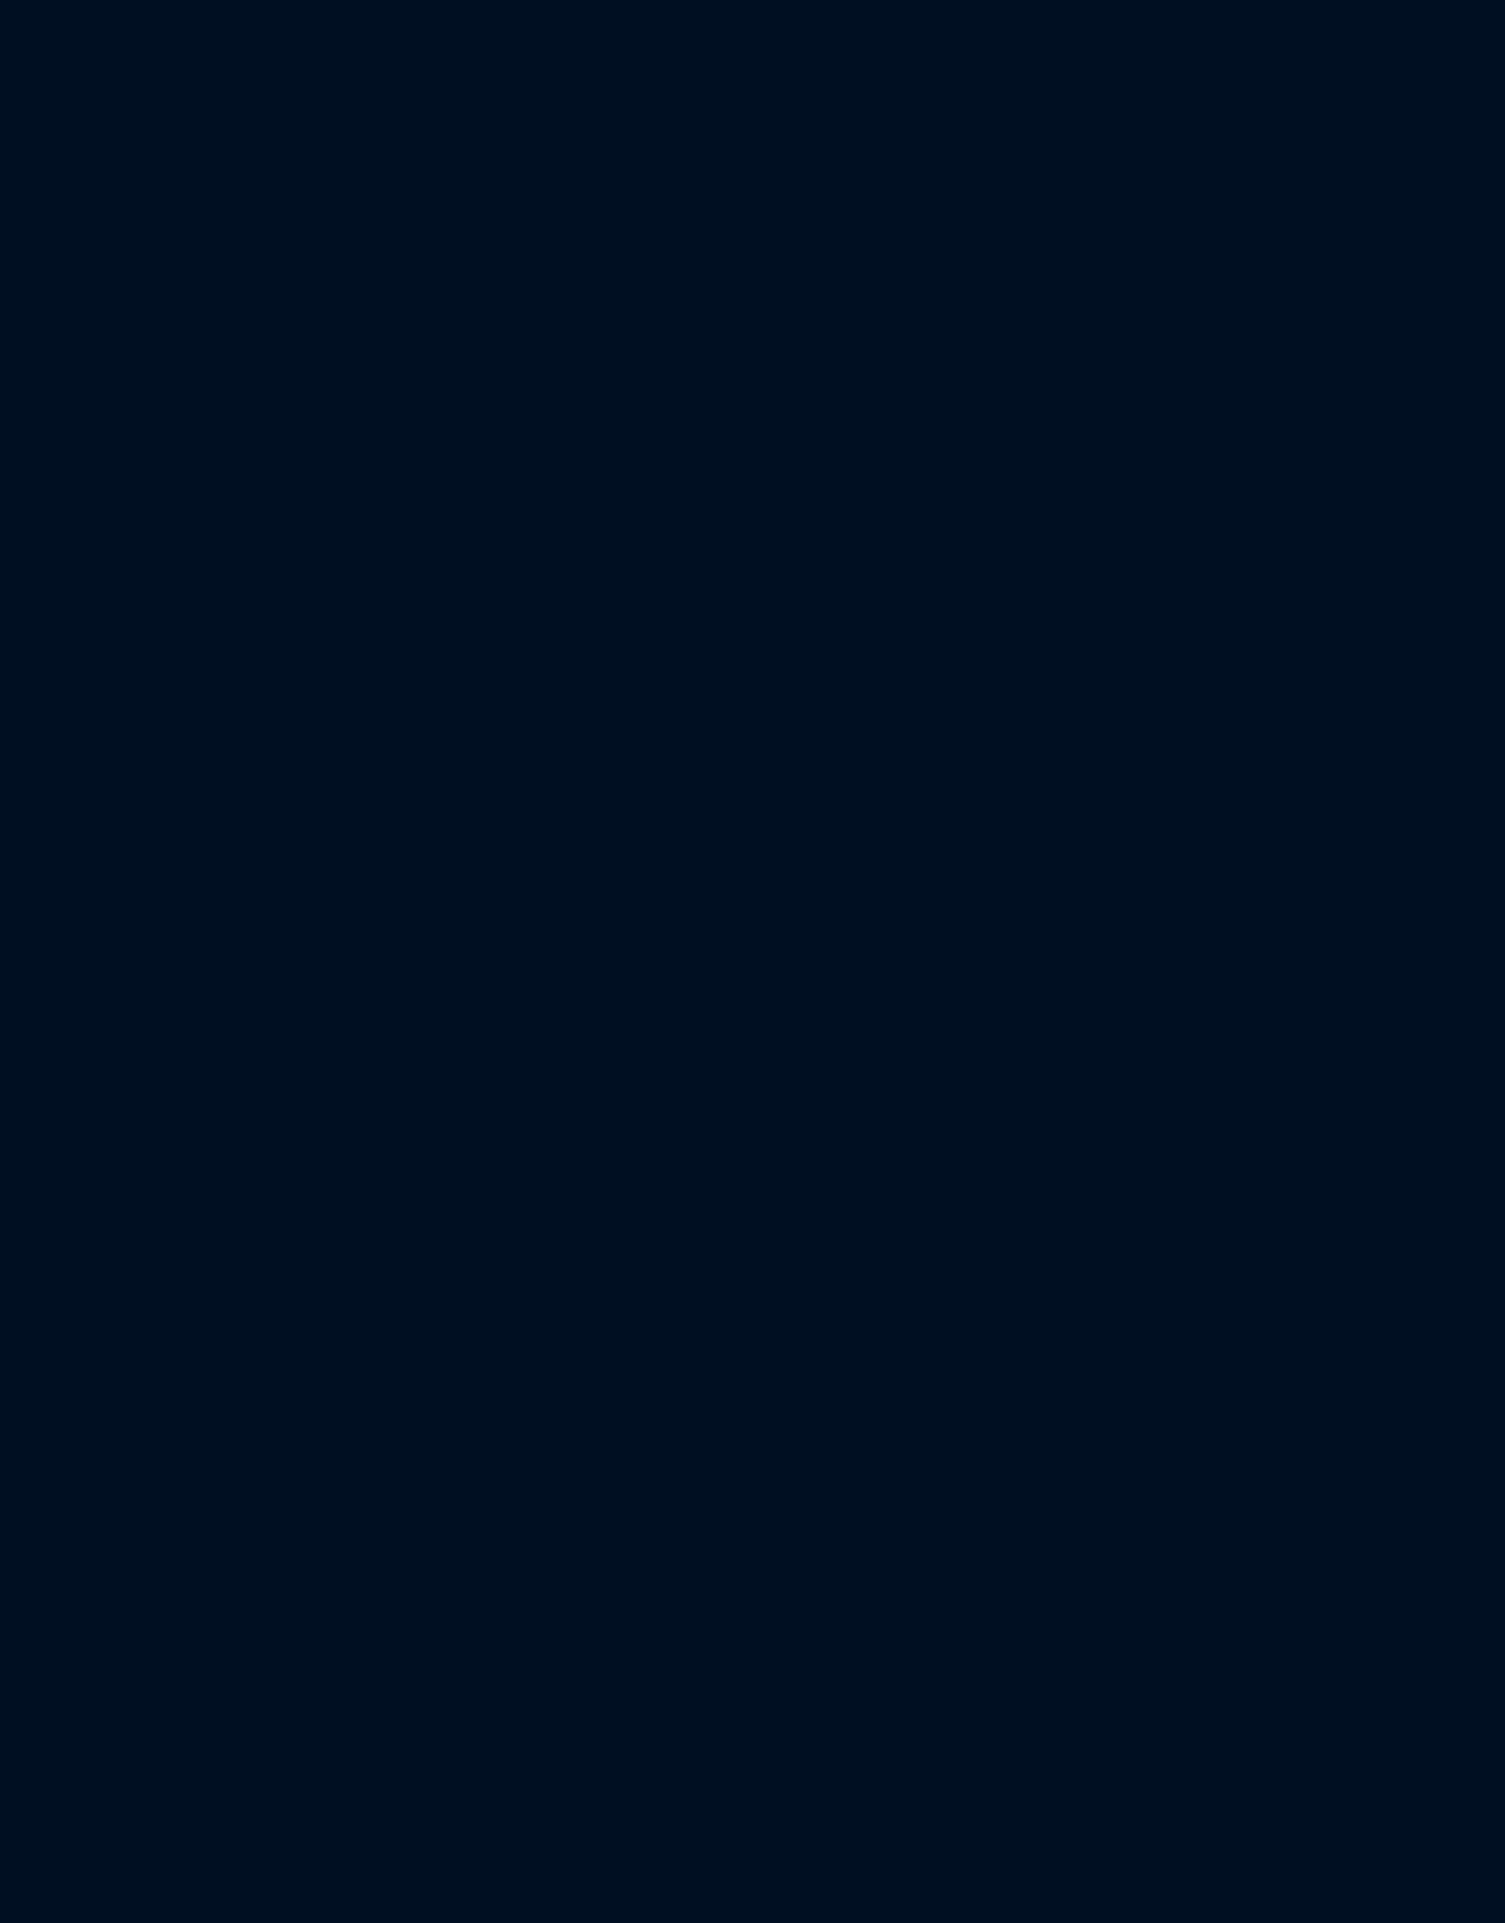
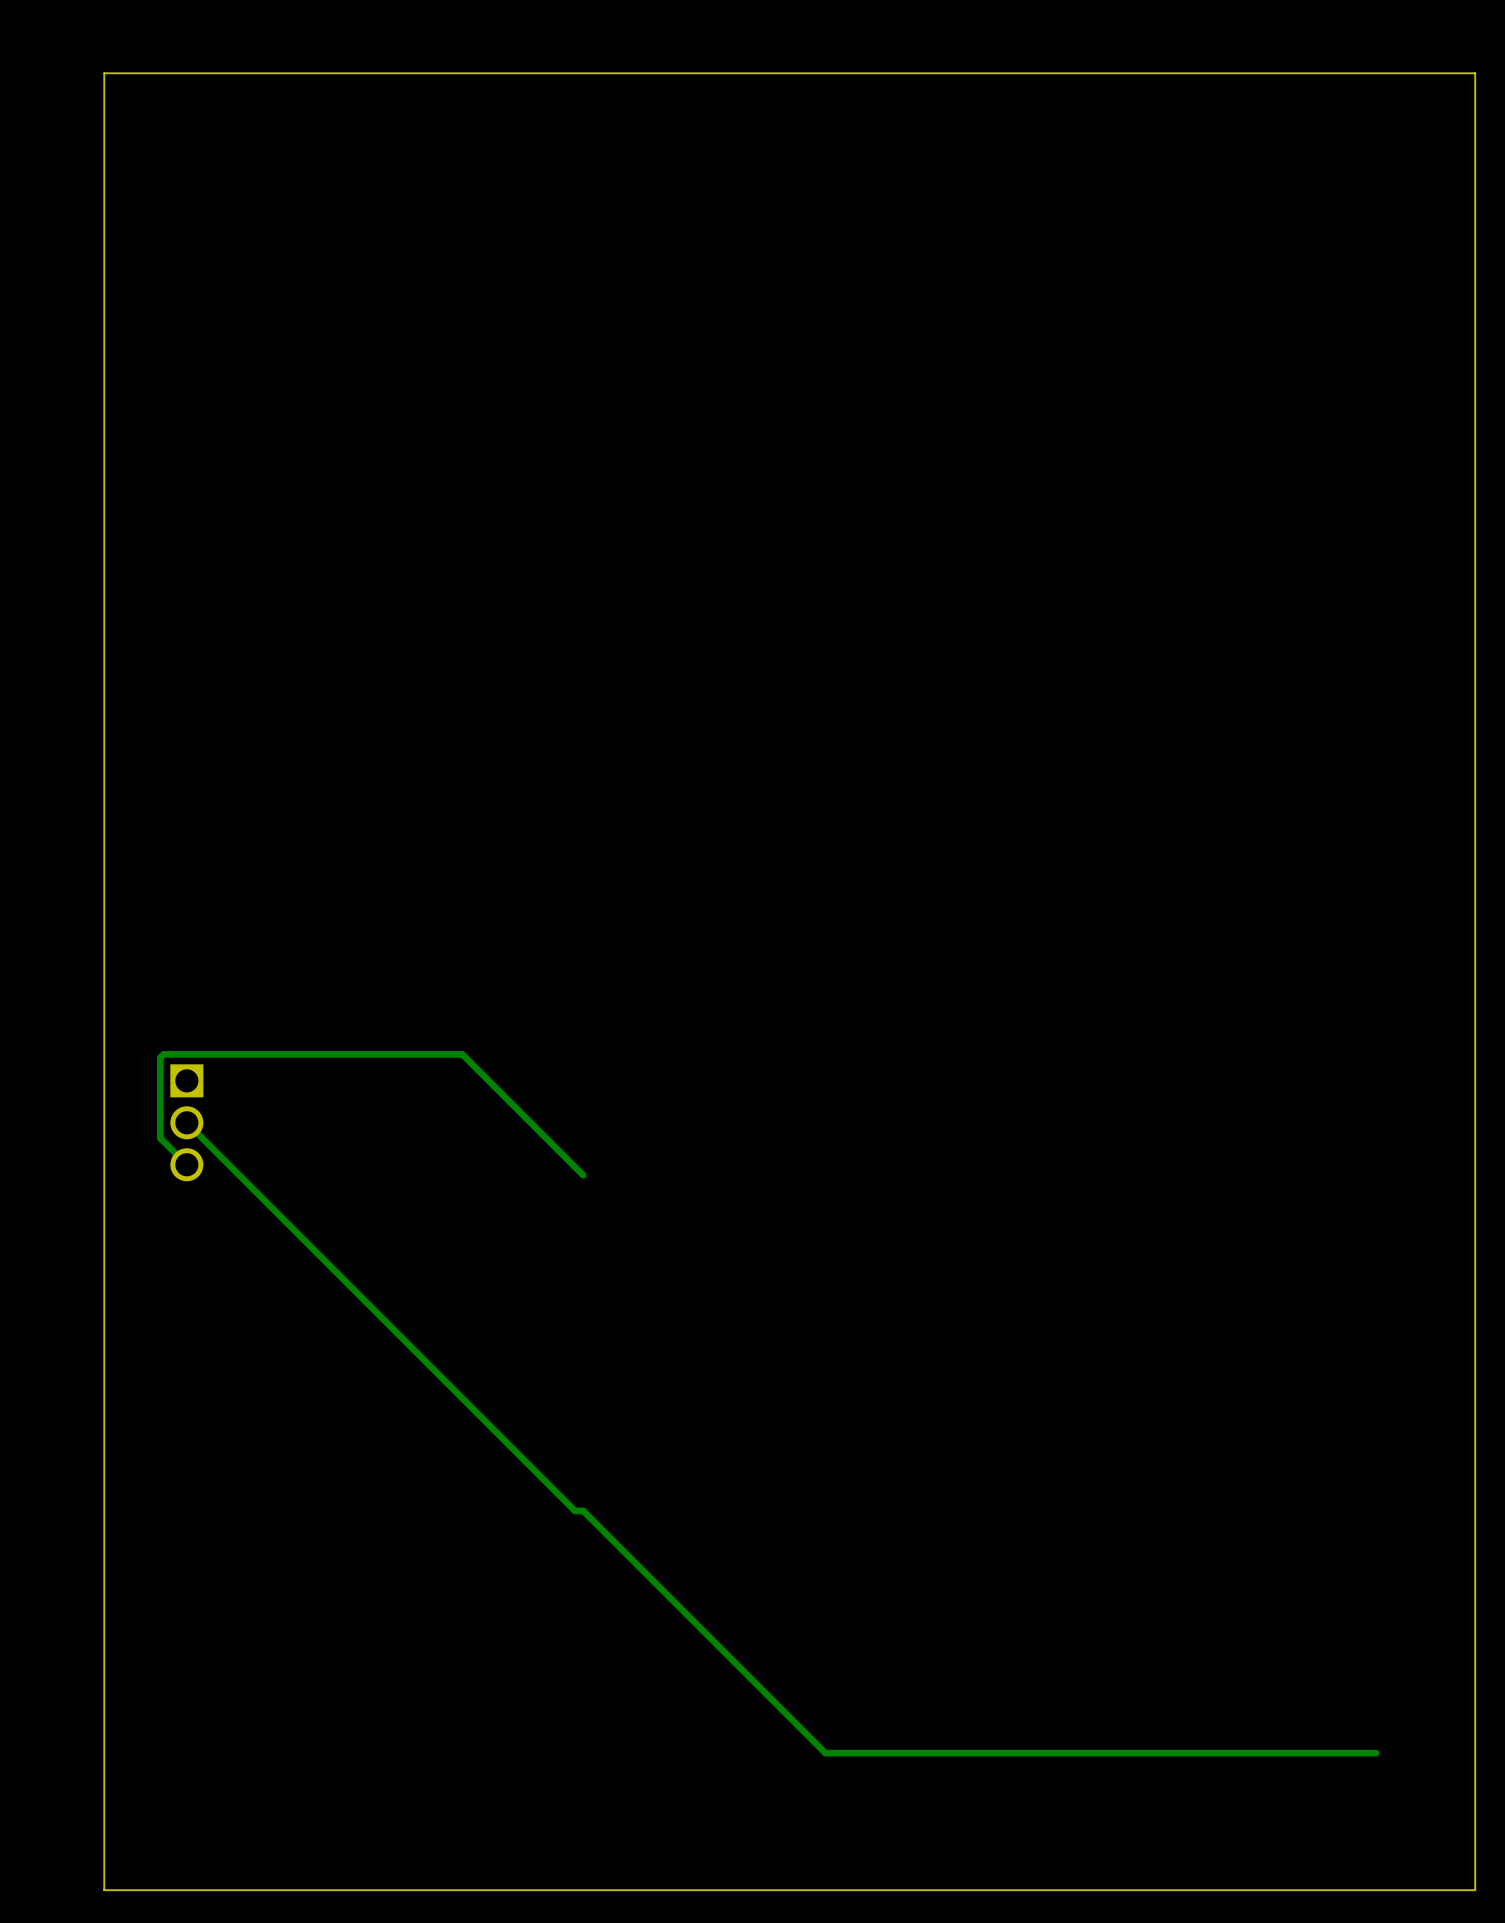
board edge: none -> (1475, 73) (104, 73) (104, 1890) (1475, 1890) (1475, 73)
bottom track: none -> (186, 1122) (575, 1510) (583, 1510) (825, 1753) (1376, 1753)
part: none -> (186, 1122)
bottom track: none -> (186, 1164) (160, 1138) (160, 1057) (163, 1054) (462, 1054) (583, 1175)

